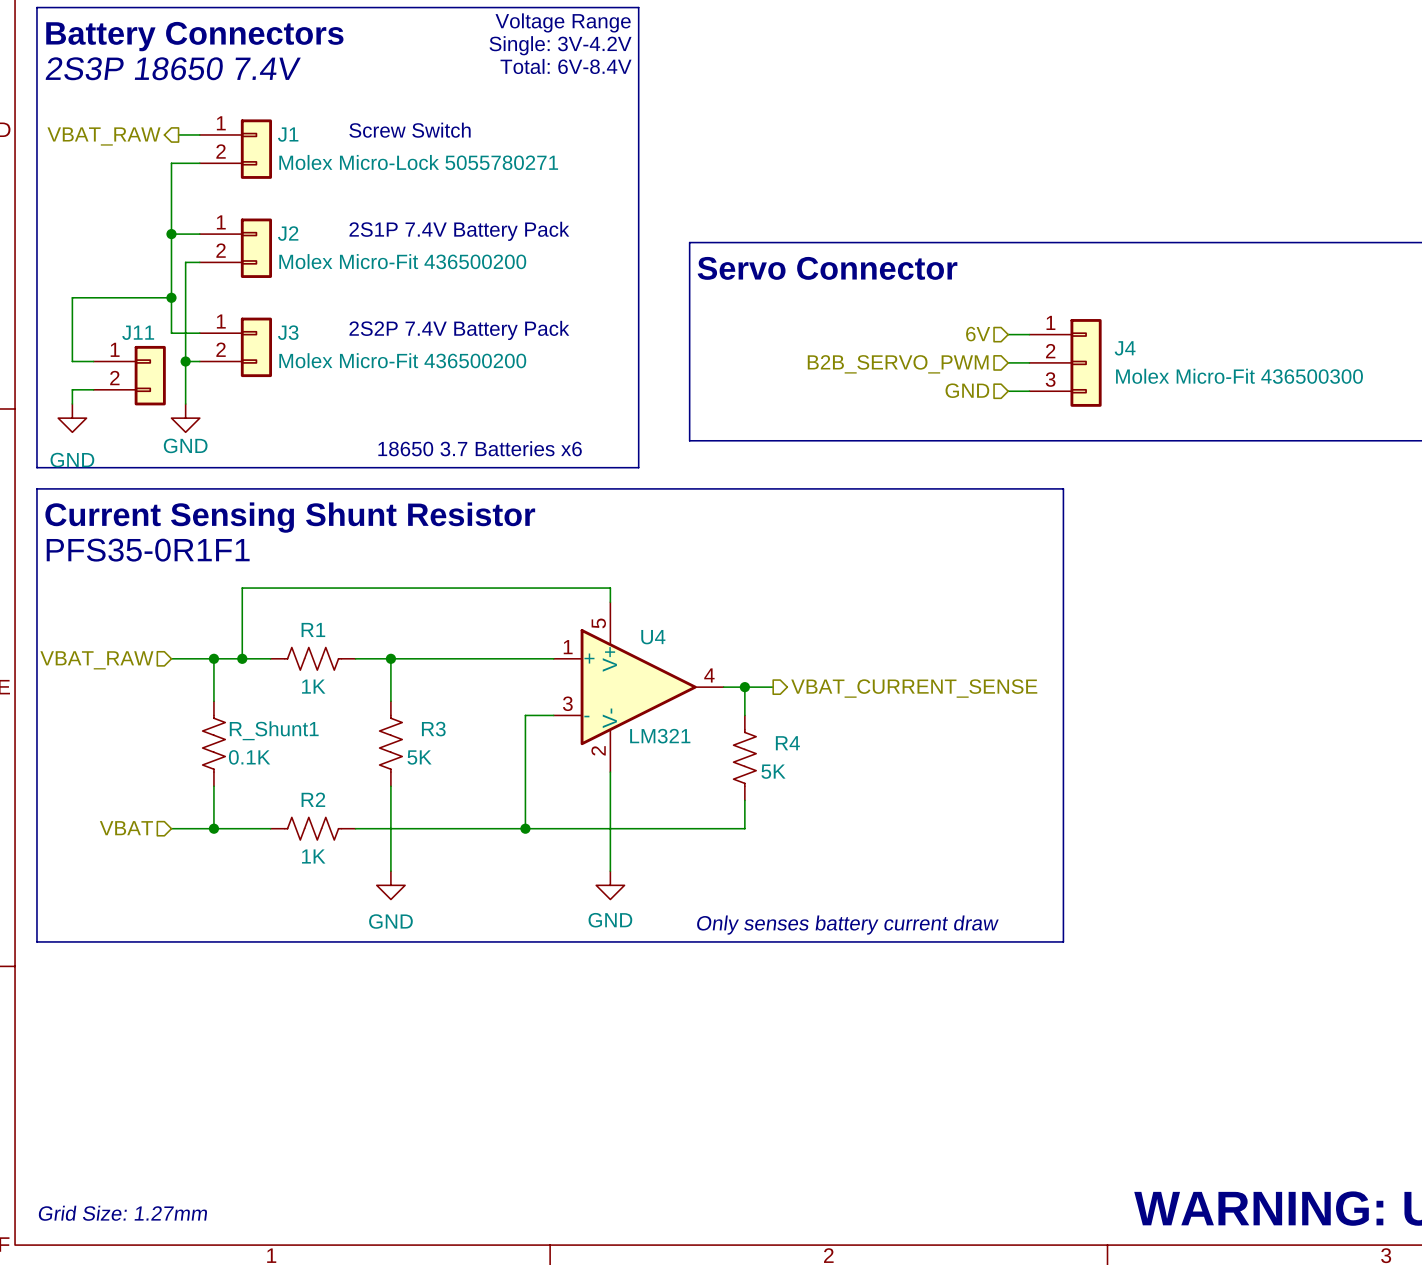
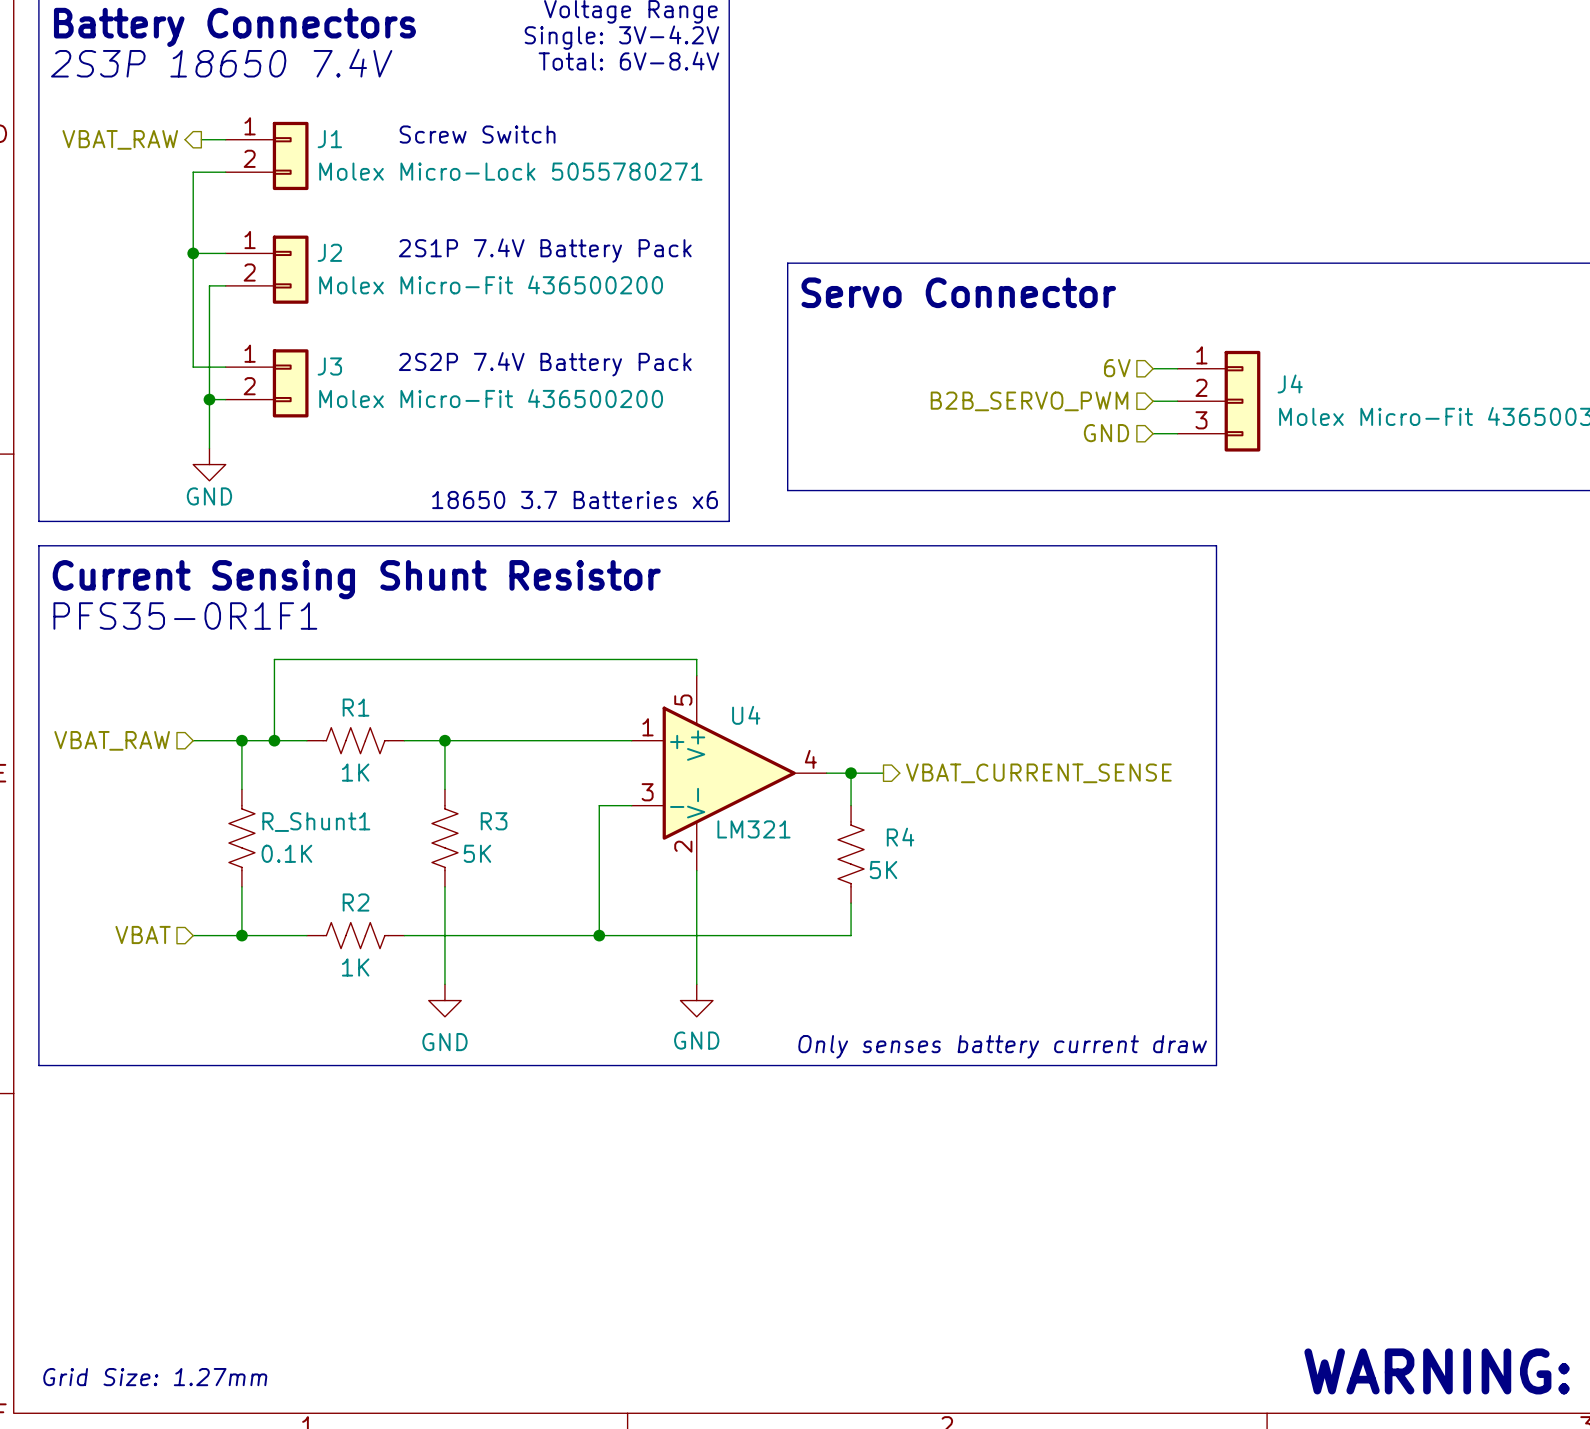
wire: (171, 297) (72, 297) (72, 361) (93, 361) -> none
junction: (171, 297) -> none
J11: (129, 375) -> none
wire: (93, 389) (72, 389) (72, 403) -> none
power symbol: GND (72, 418) -> none

